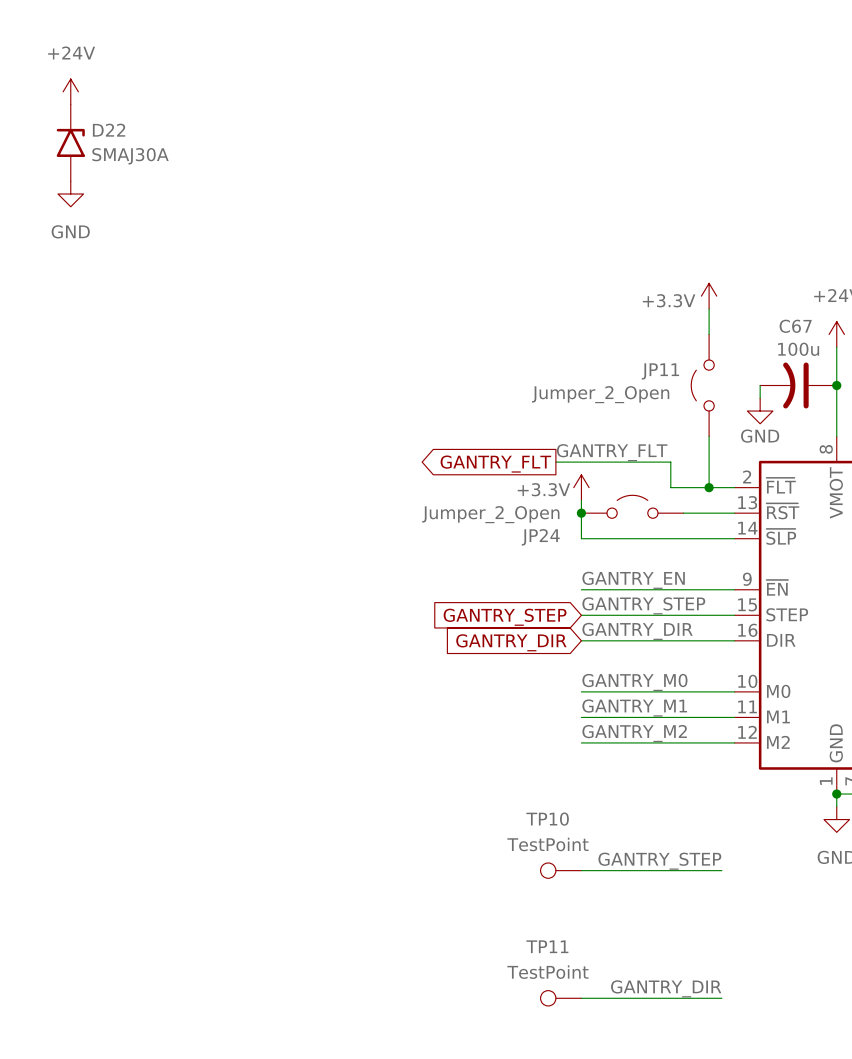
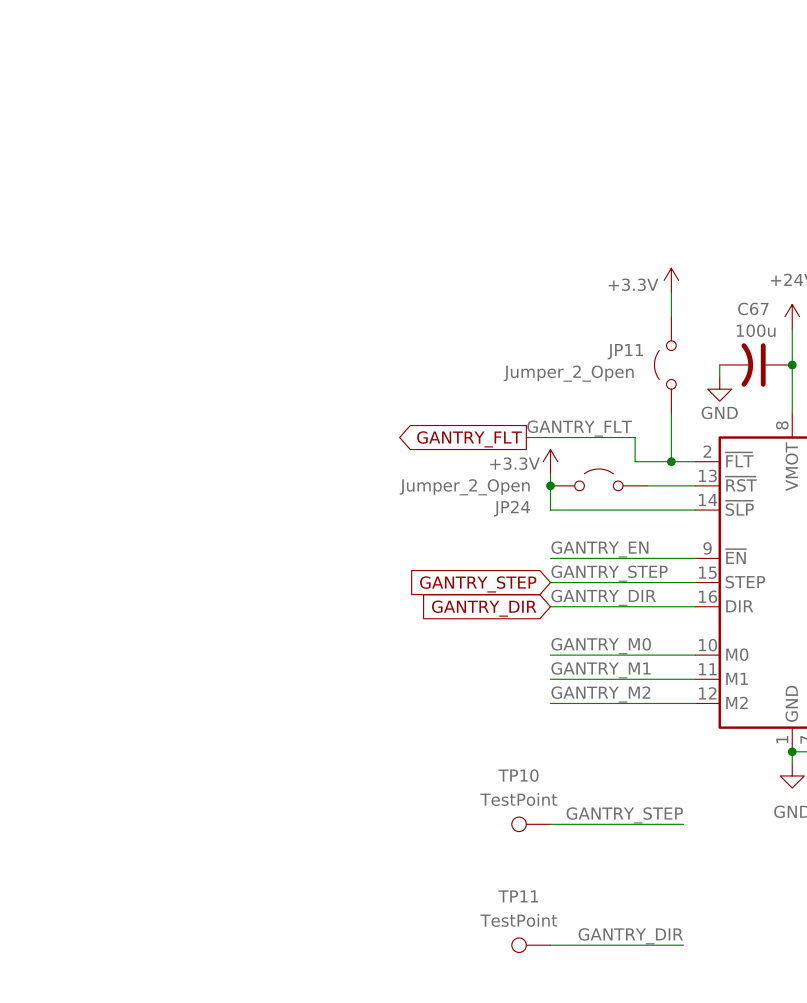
power symbol: +24V (70, 91) -> none
D22: SMAJ30A (70, 142) -> none
power symbol: GND (70, 194) -> none

